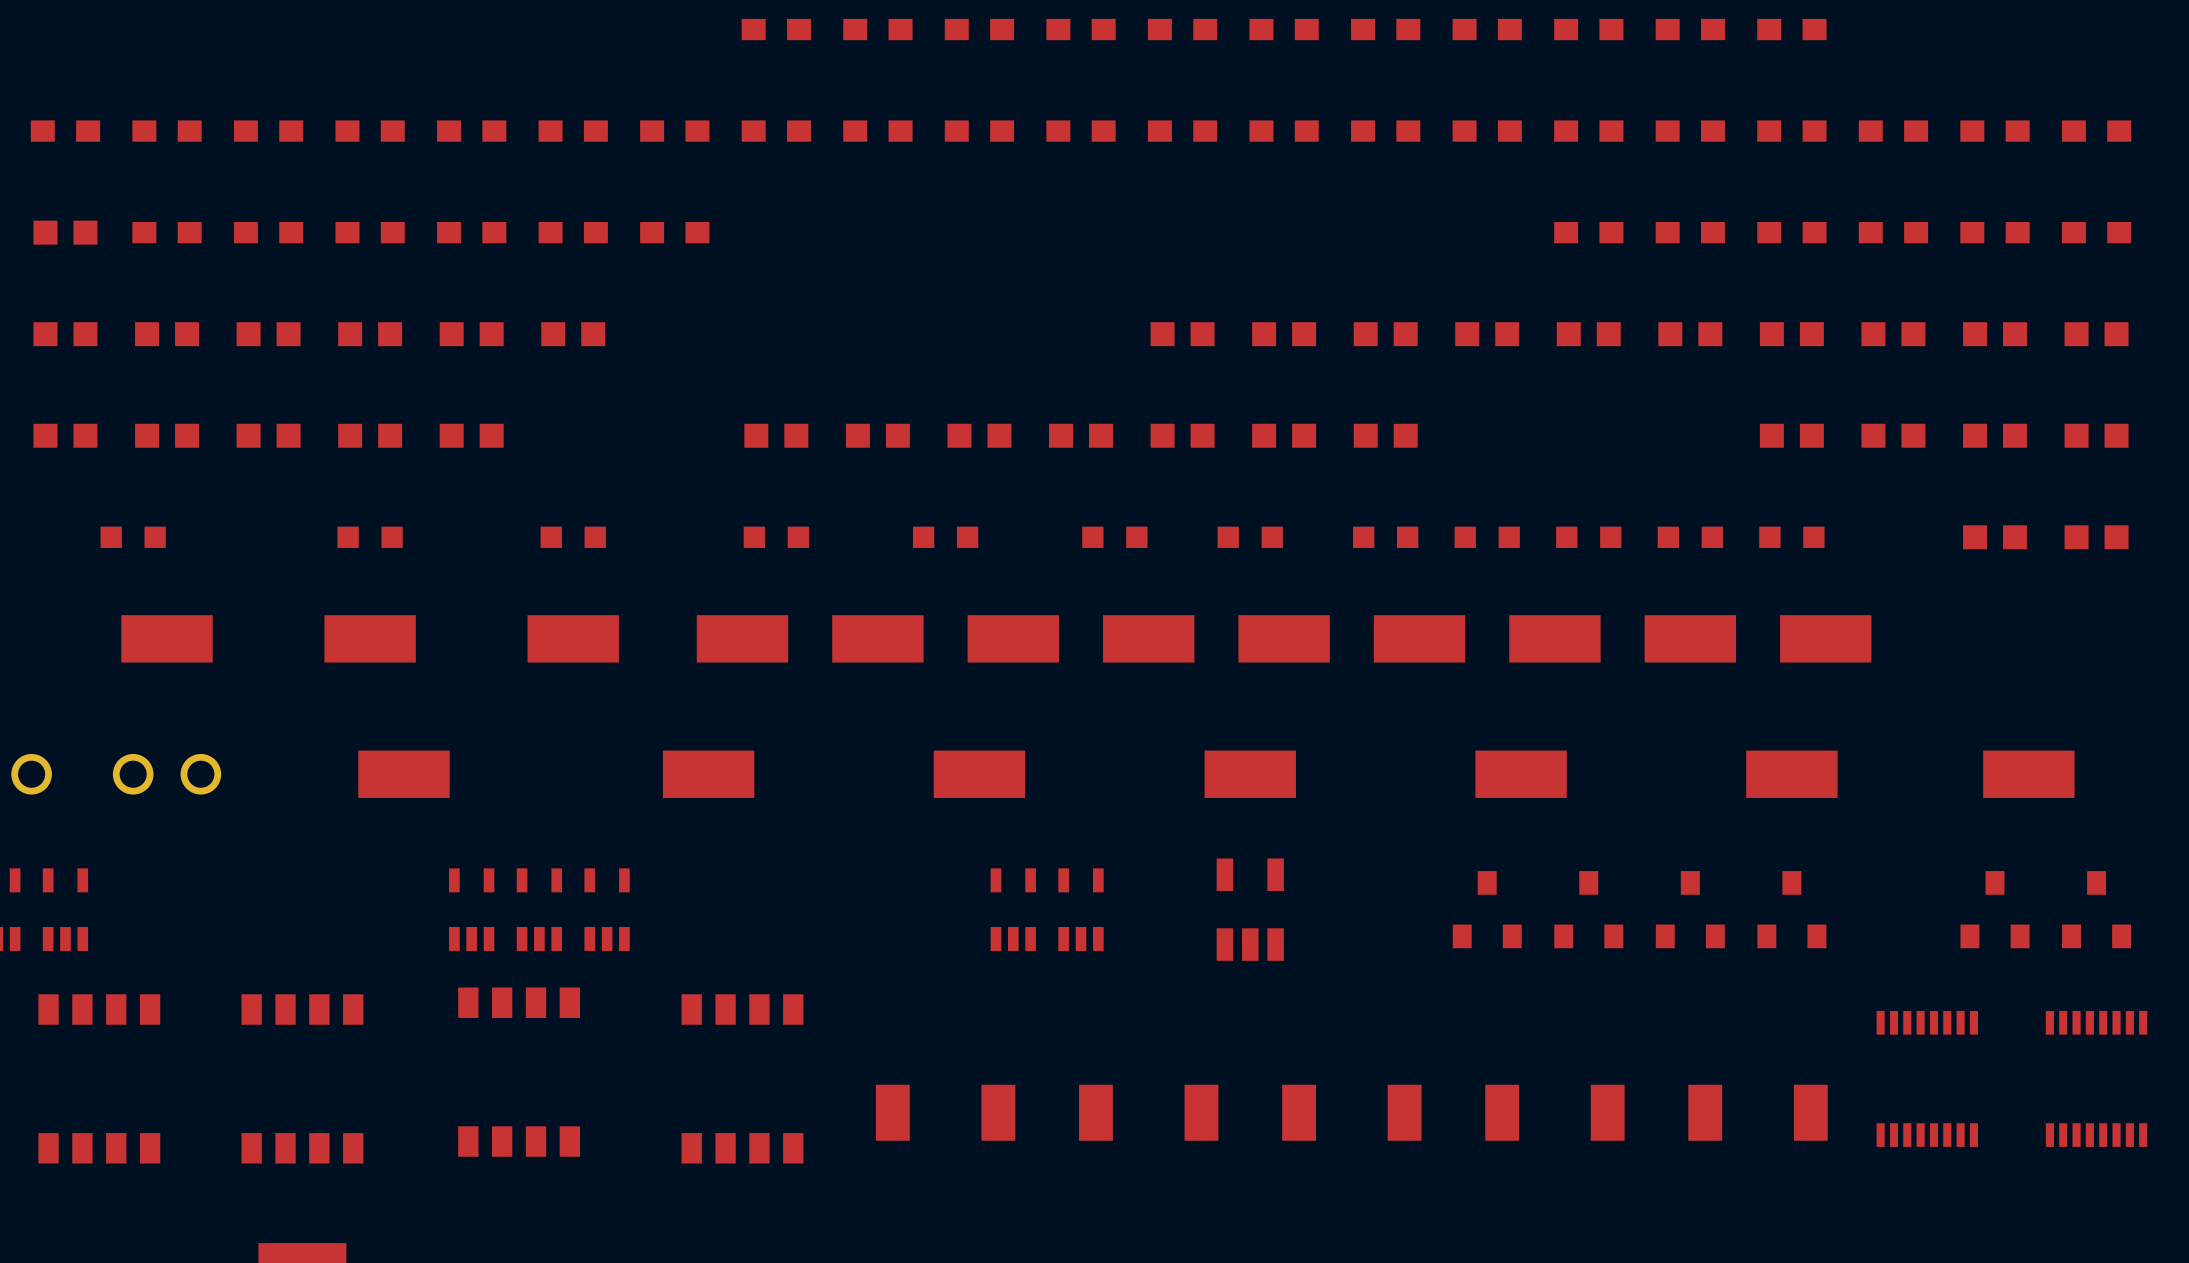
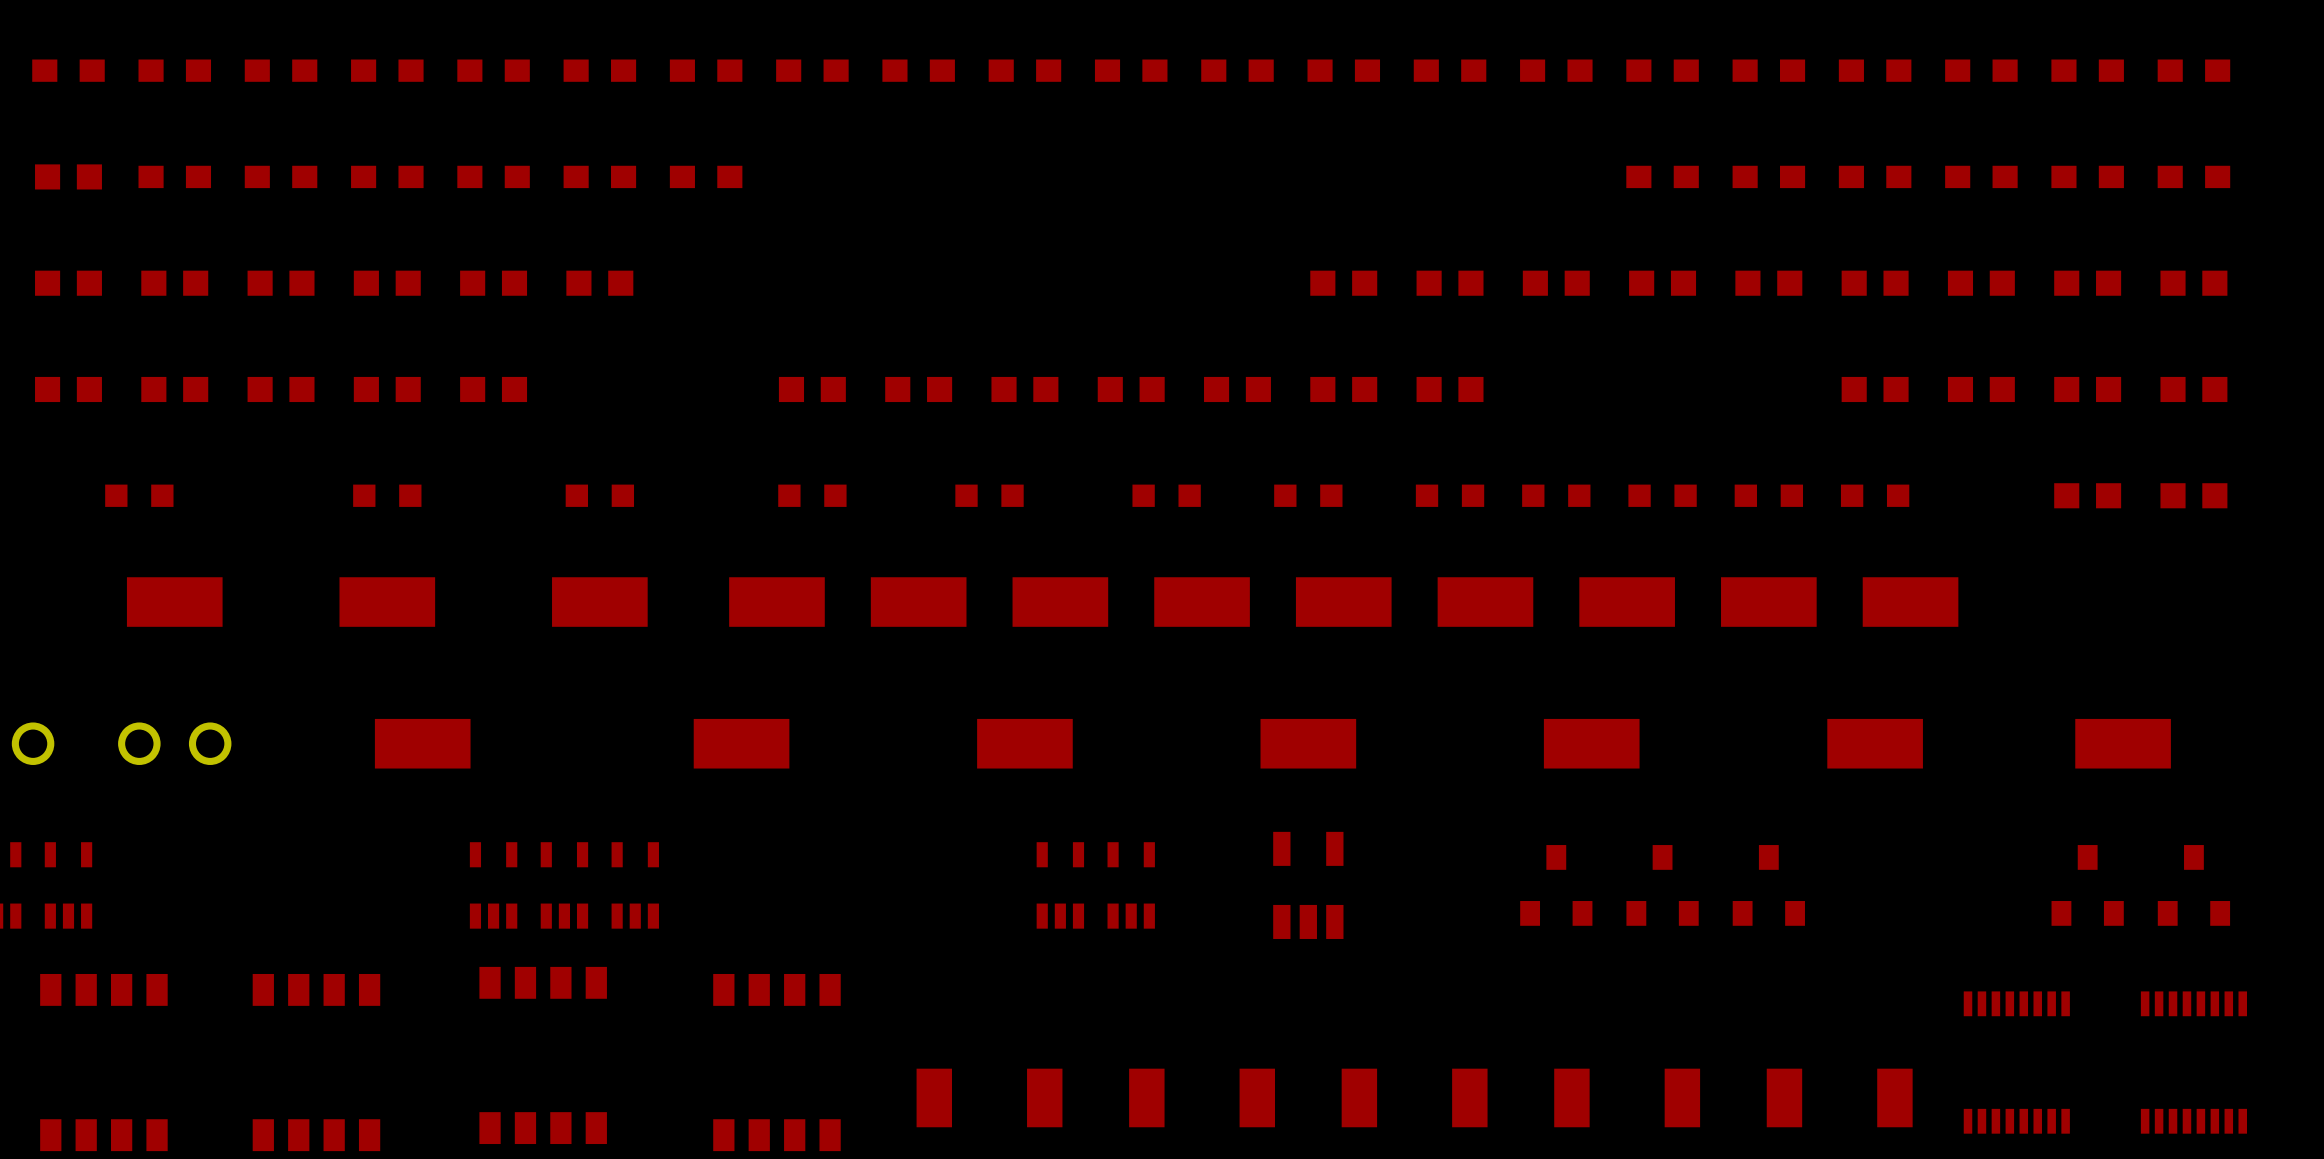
part: (1182, 334) -> none
part: (1791, 909) -> none

